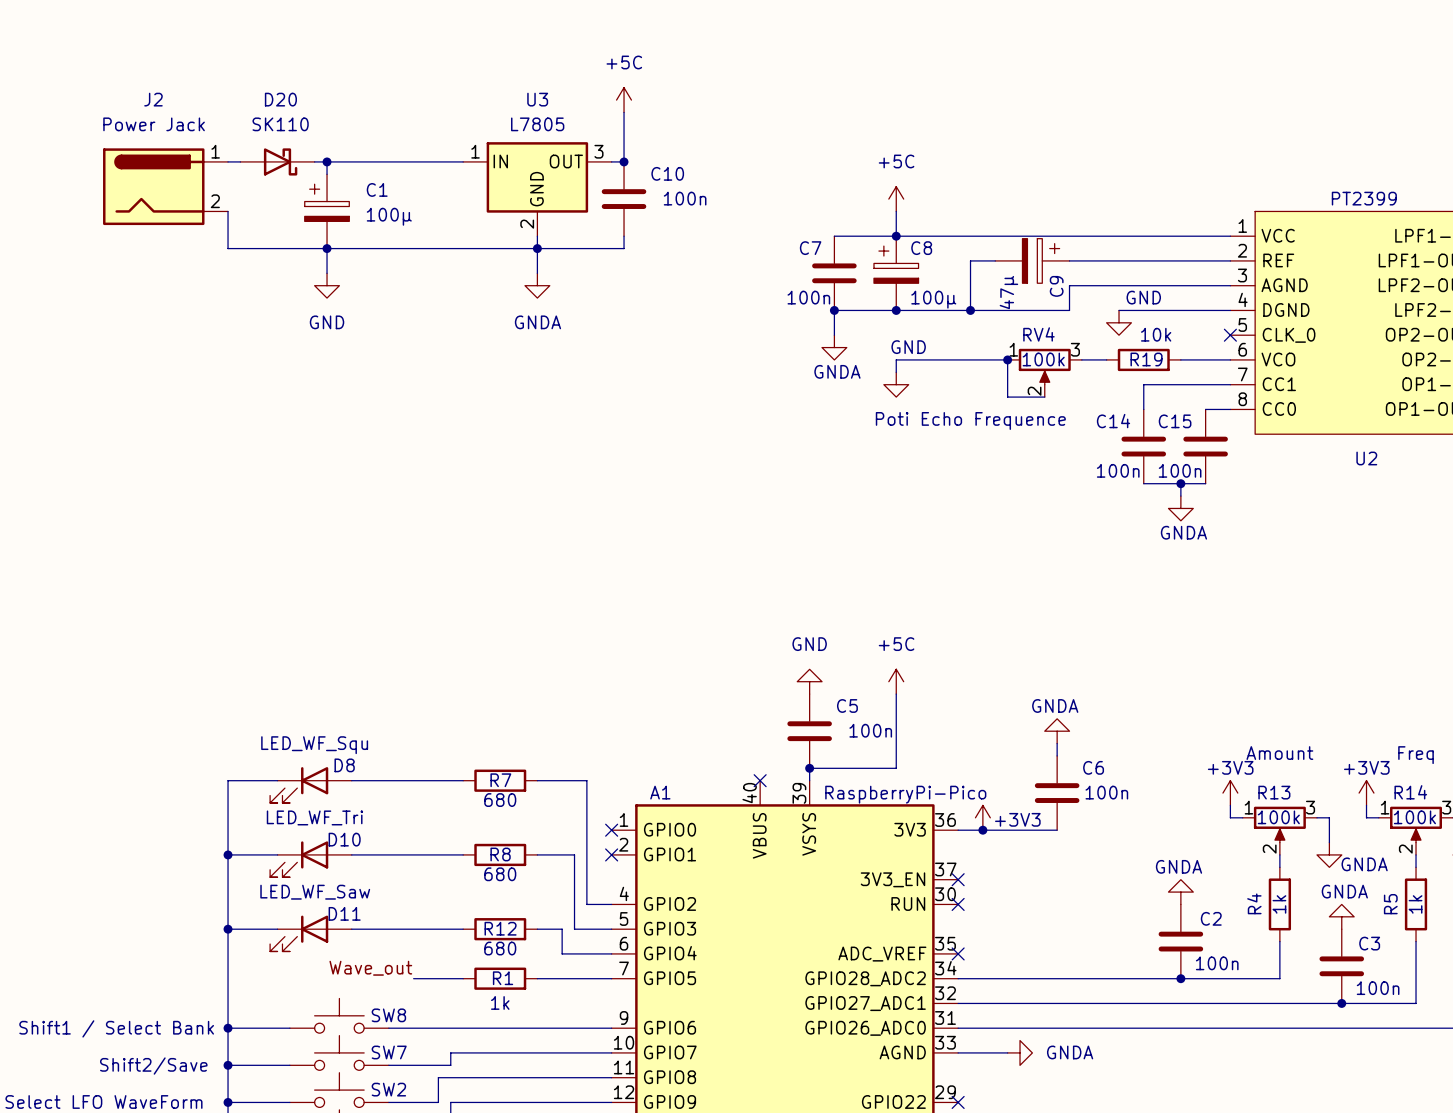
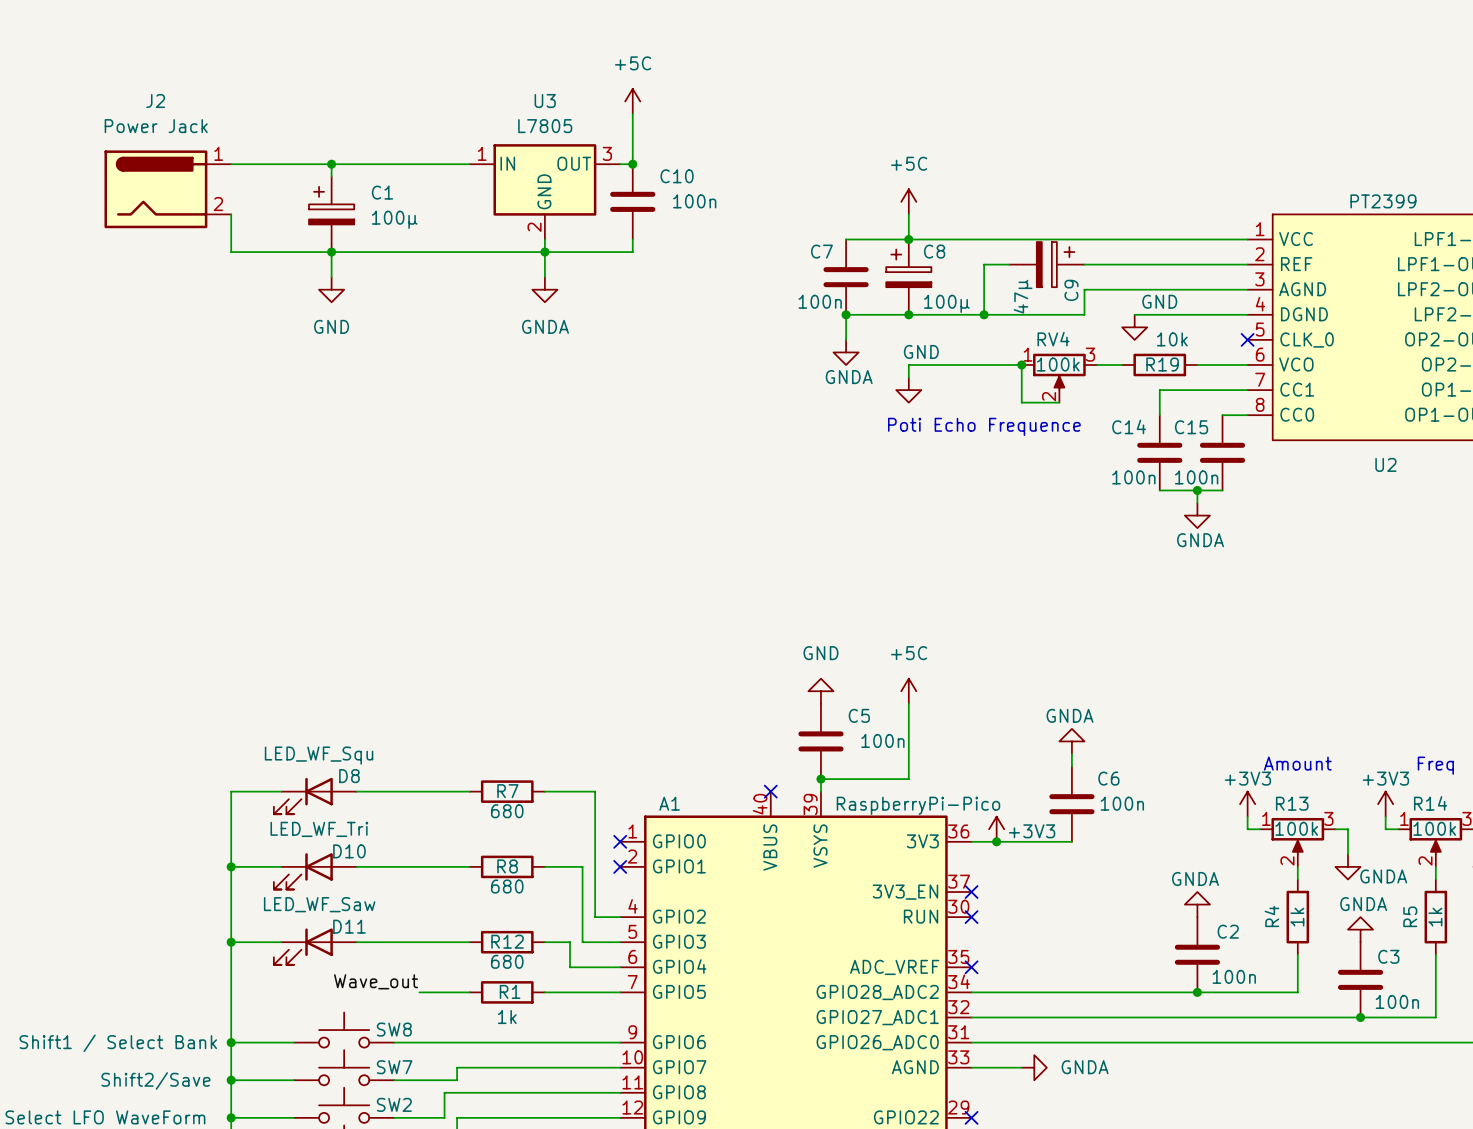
D20: SK110 (277, 161) -> none

